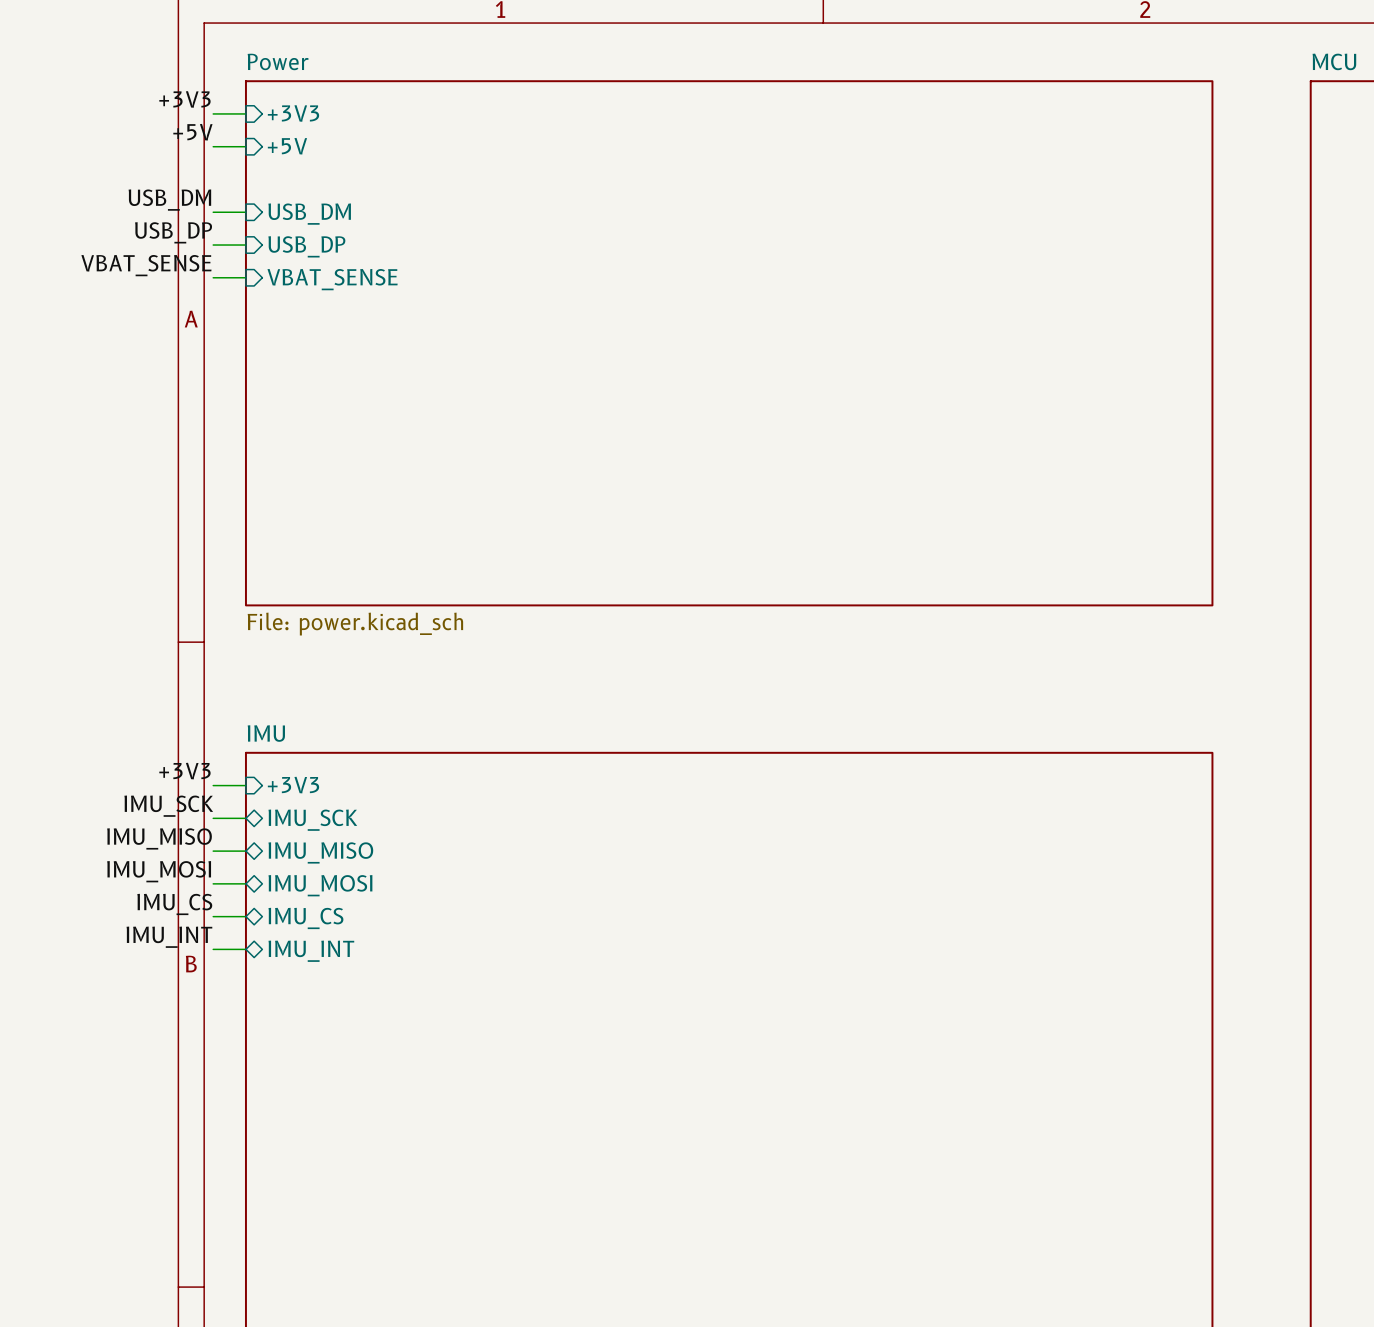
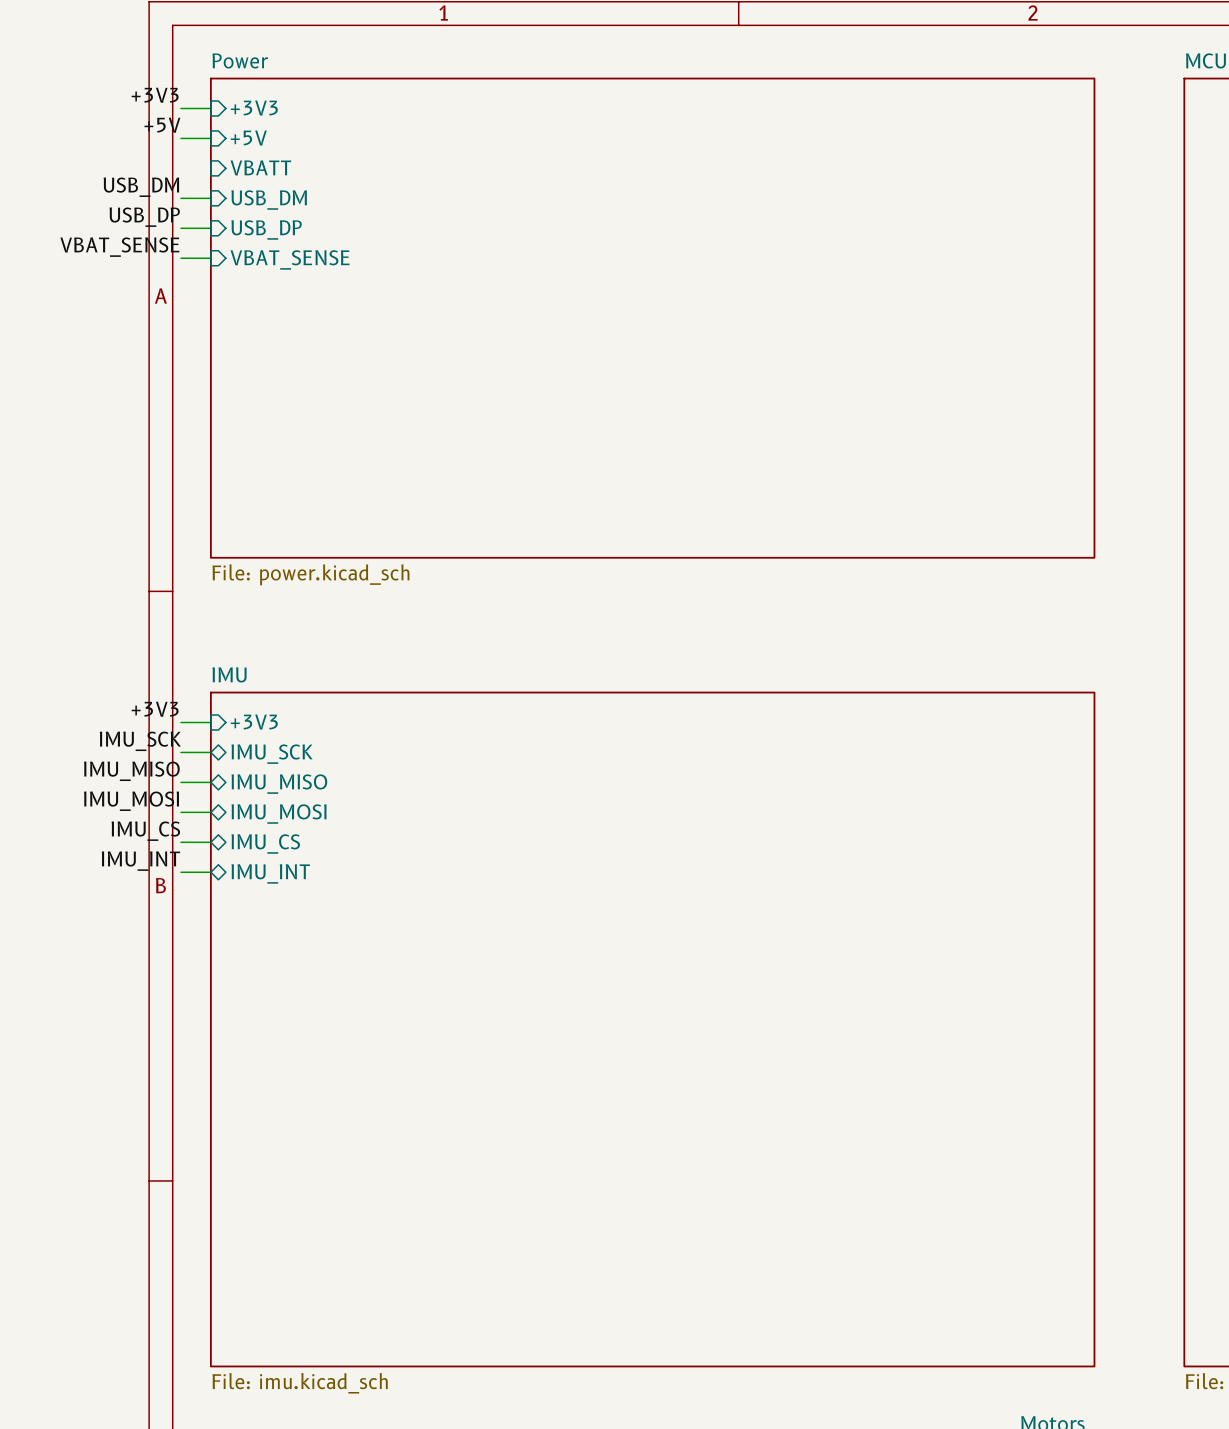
sheet pin: none -> VBATT (260, 167)

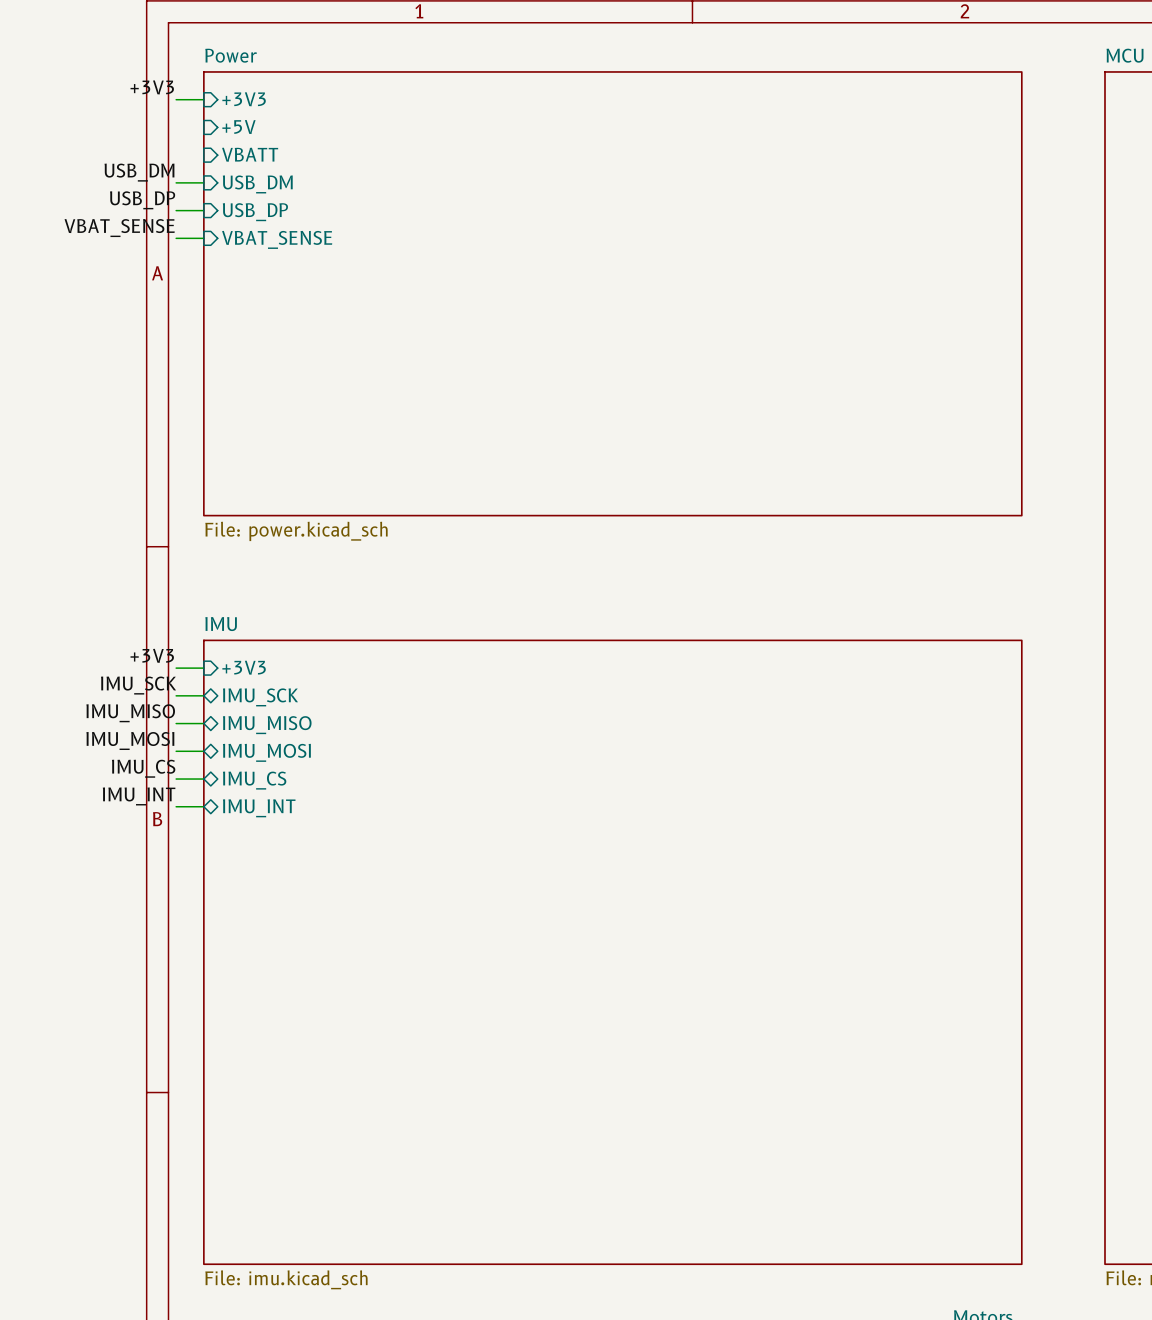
label: +5V (162, 125) -> none
wire: (180, 138) (210, 138) -> none

